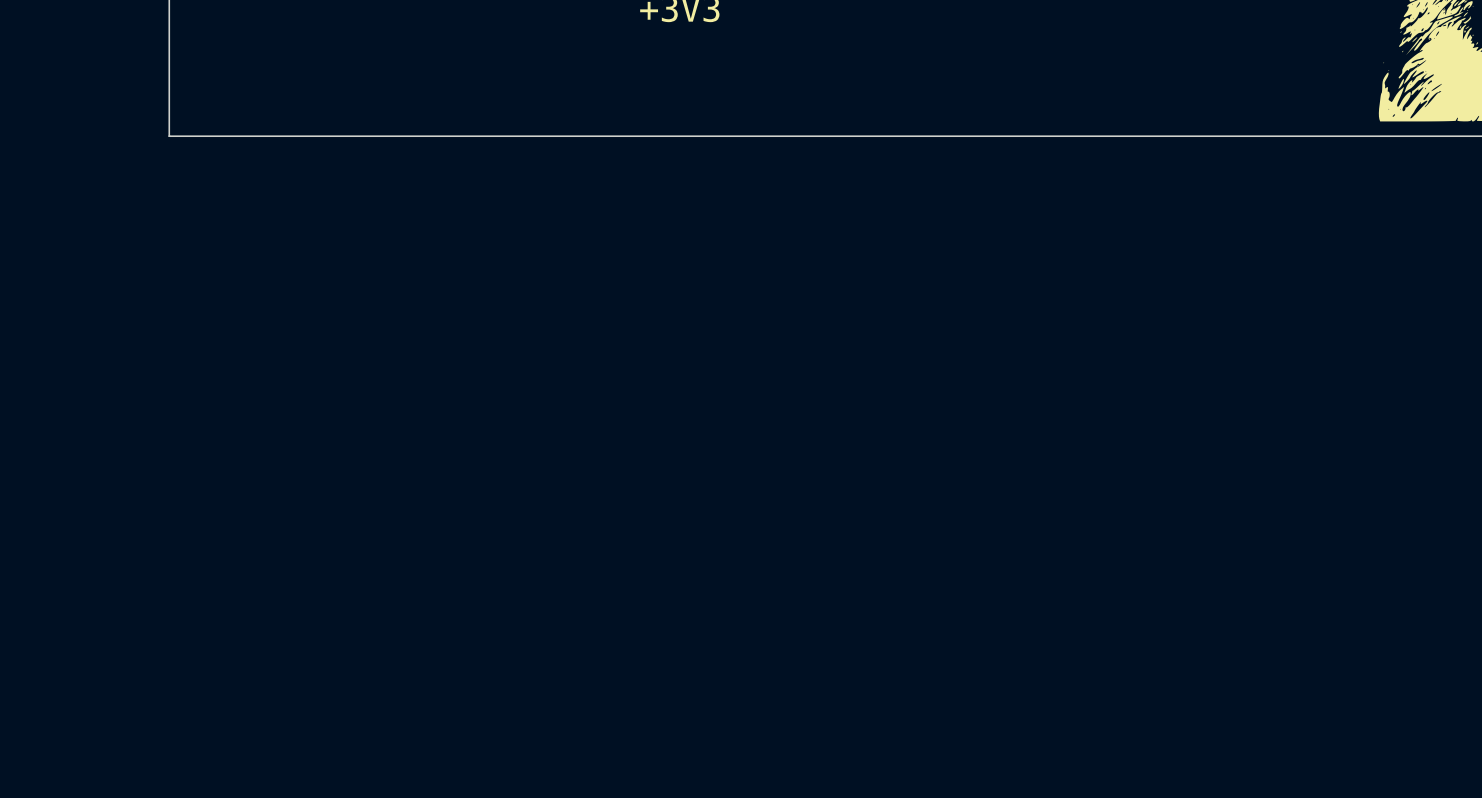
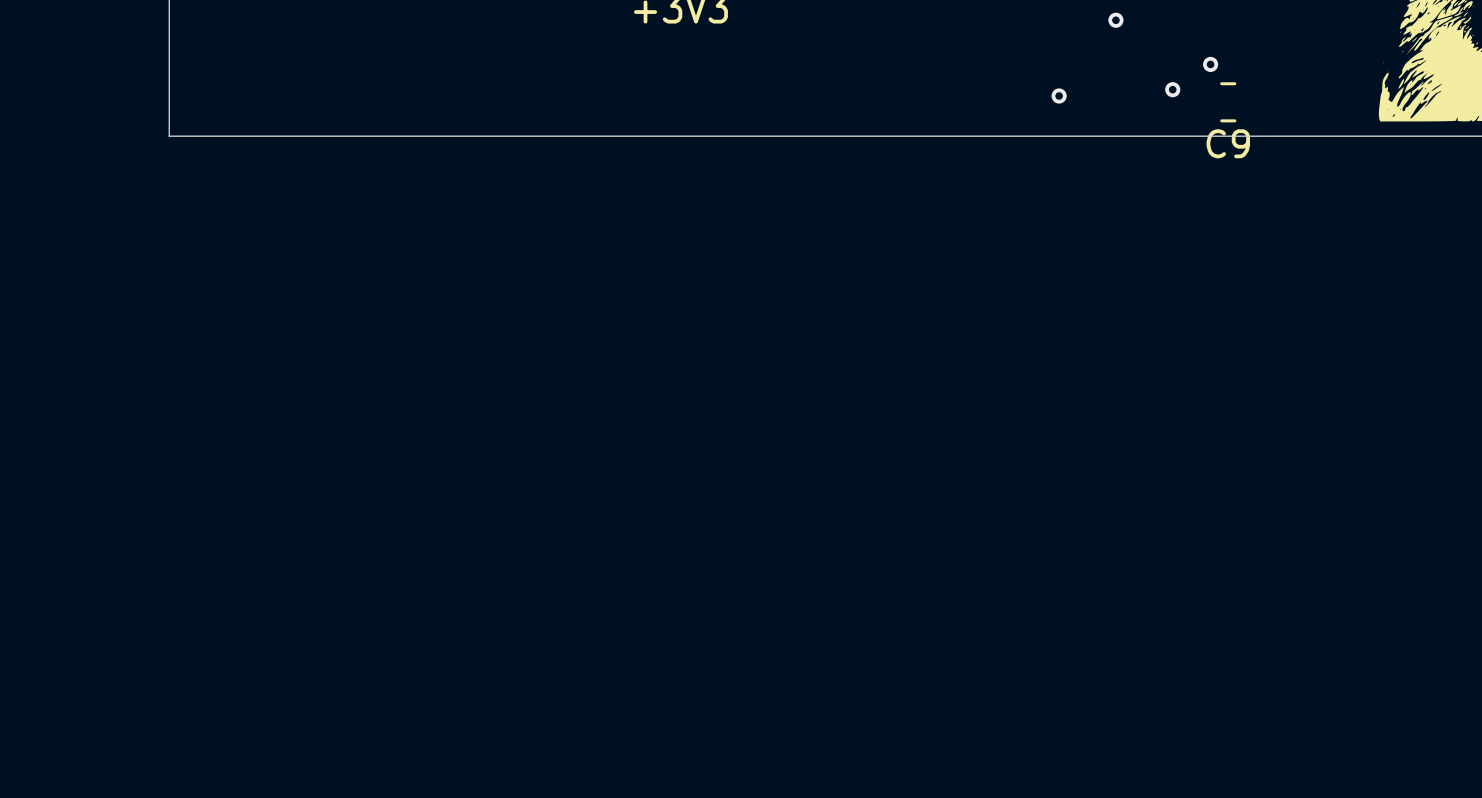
via: none -> (1115, 20)
via: none -> (1210, 64)
via: none -> (1172, 89)
via: none -> (1059, 95)
C9: none -> (1228, 102)

